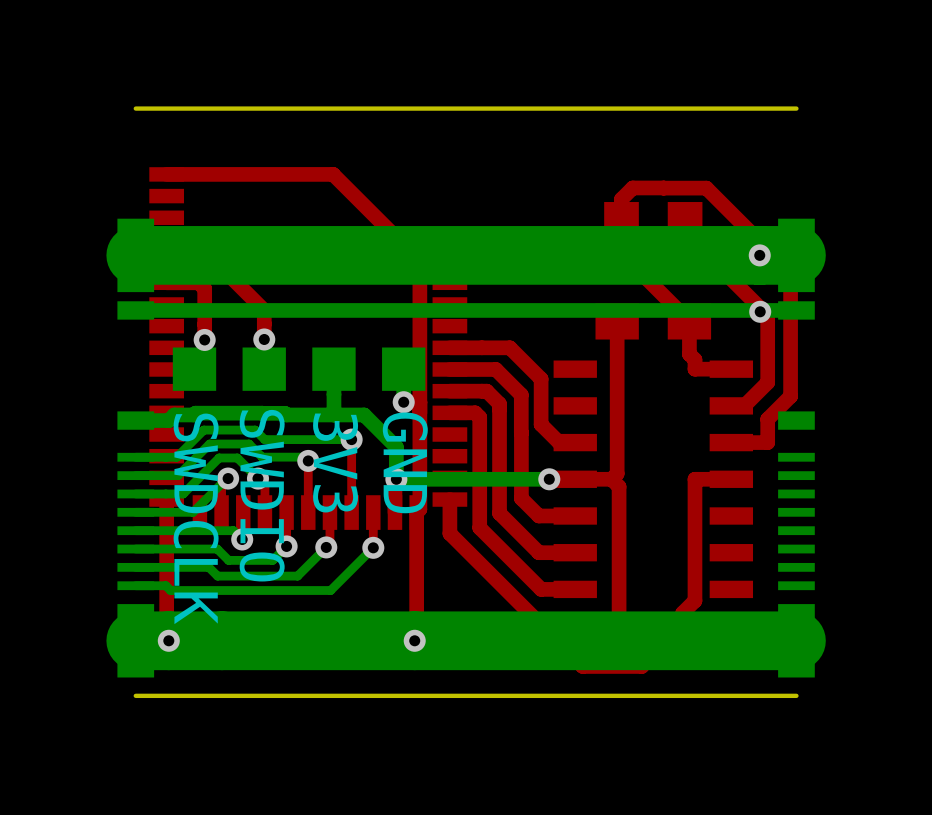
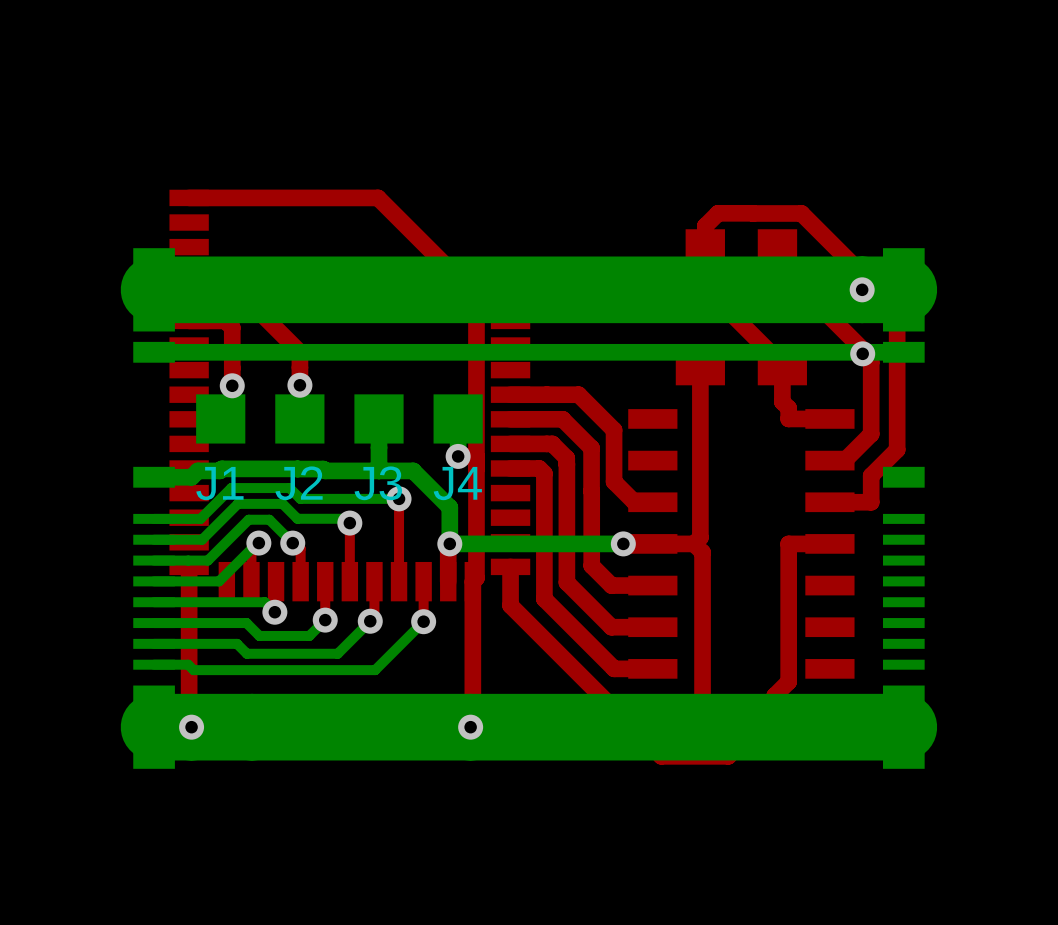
board edge: (796, 108) (135, 108) -> none
J2 name: none -> J2 (299, 483)
J3 name: none -> J3 (378, 483)
J1 name: none -> J1 (219, 483)
J4 name: none -> J4 (457, 483)
text: GND (405, 462) -> none
text: 3V3 (335, 463) -> none
text: SWDIO (262, 495) -> none
text: SWDCLK (196, 518) -> none
board edge: (796, 695) (135, 695) -> none

